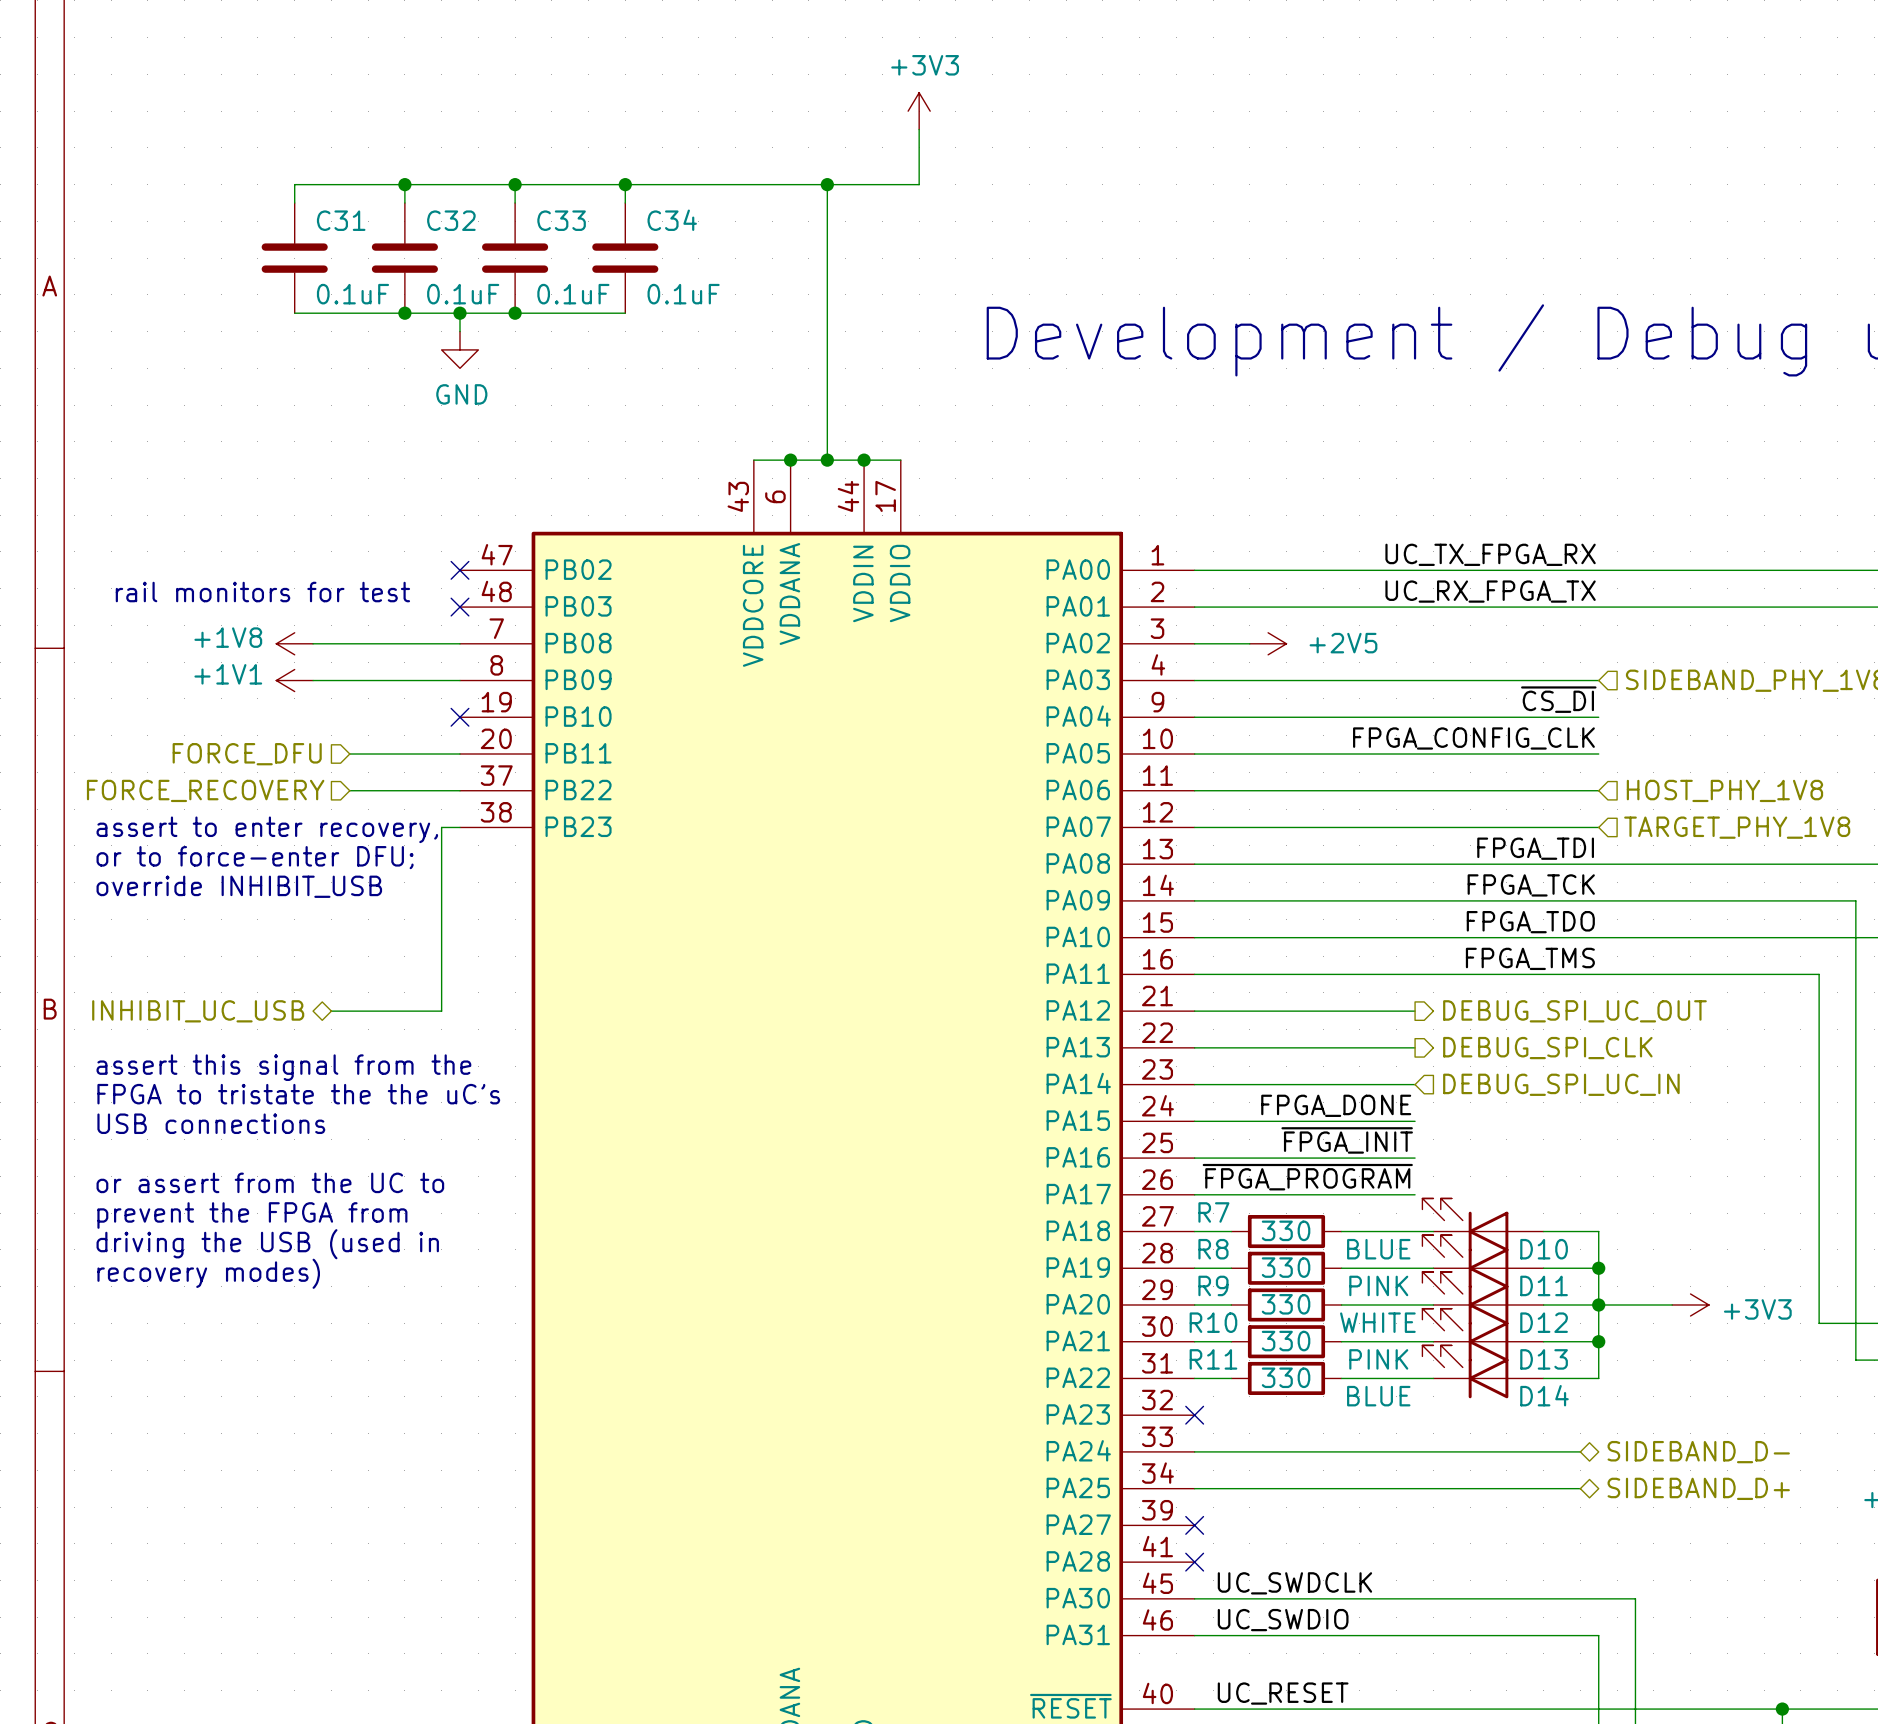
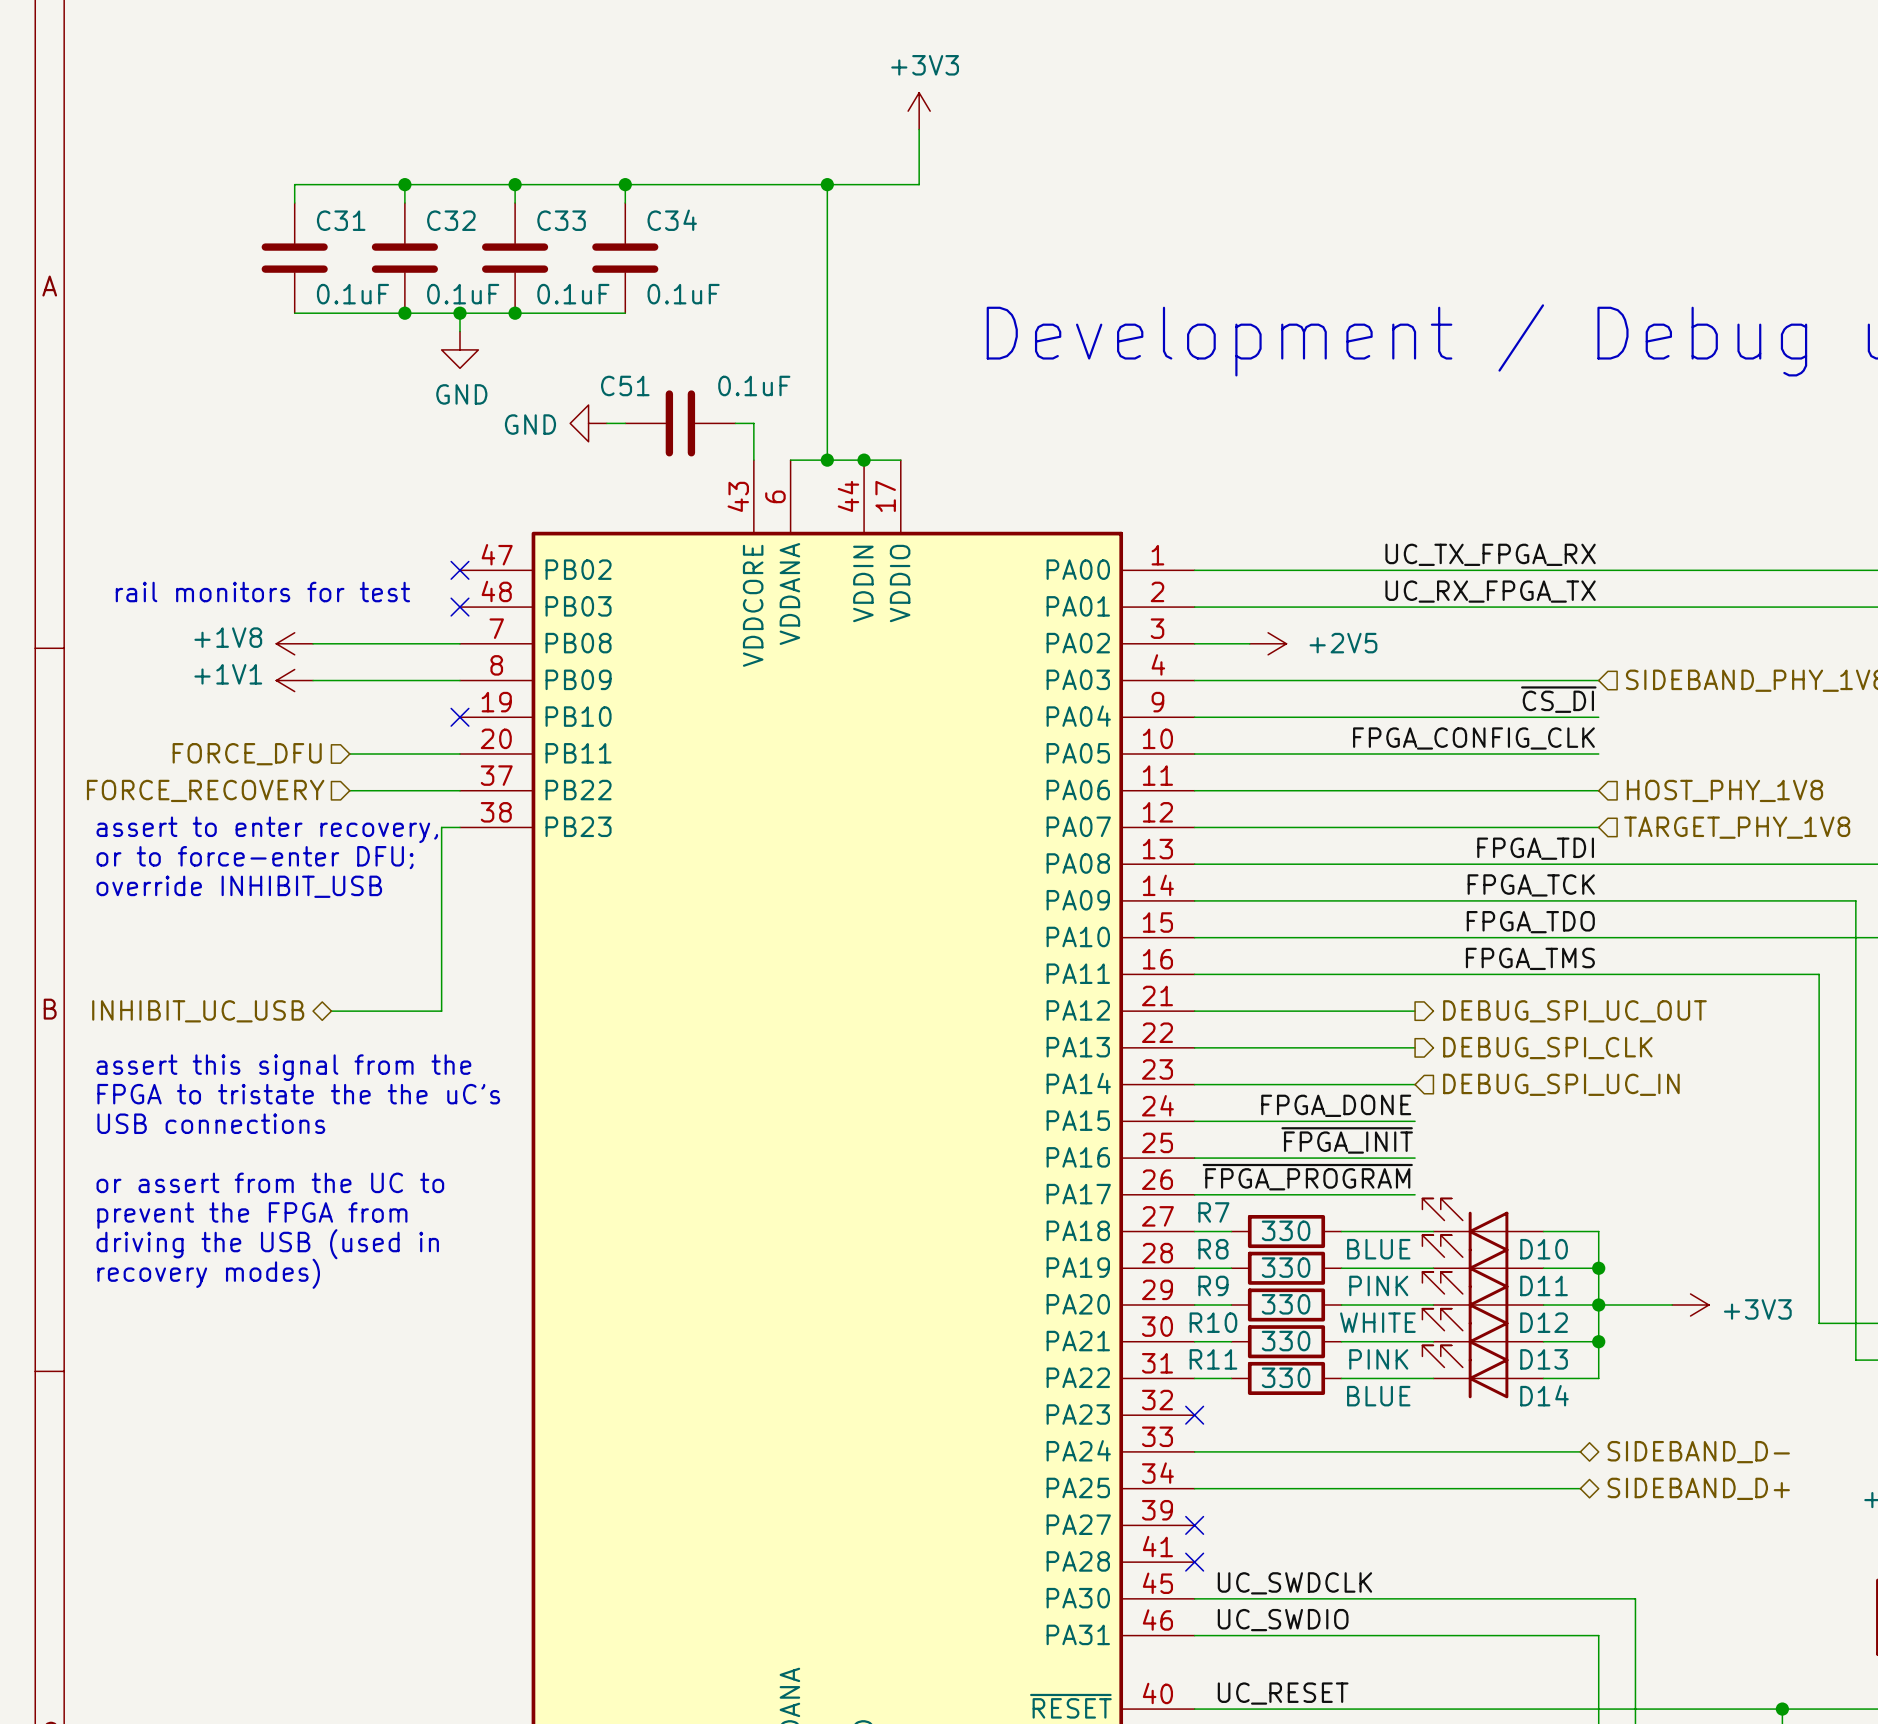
power symbol: none -> GND (588, 423)
wire: none -> (606, 423) (625, 423)
C51: none -> 0.1uF (680, 423)
wire: (753, 460) (790, 460) -> (753, 460) (753, 423) (735, 423)
junction: (790, 460) -> none

